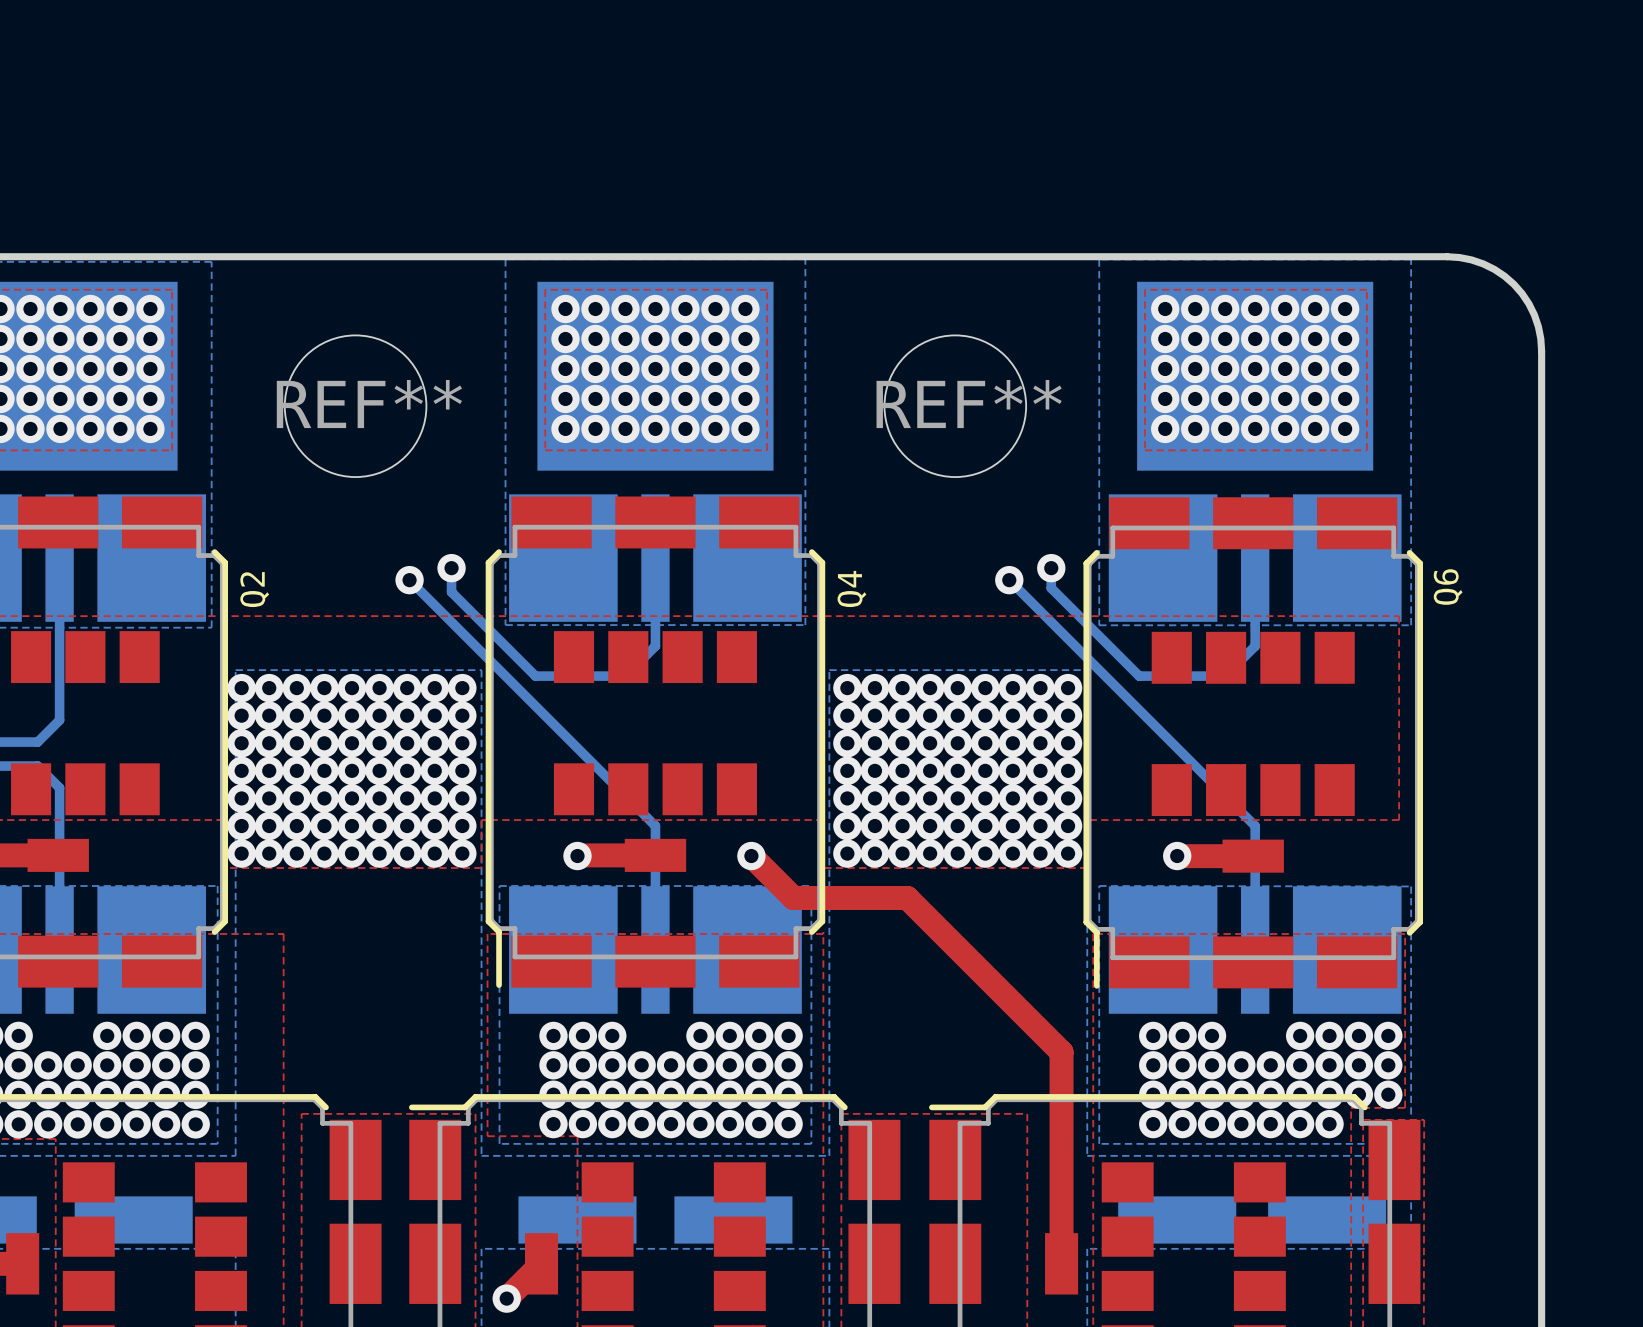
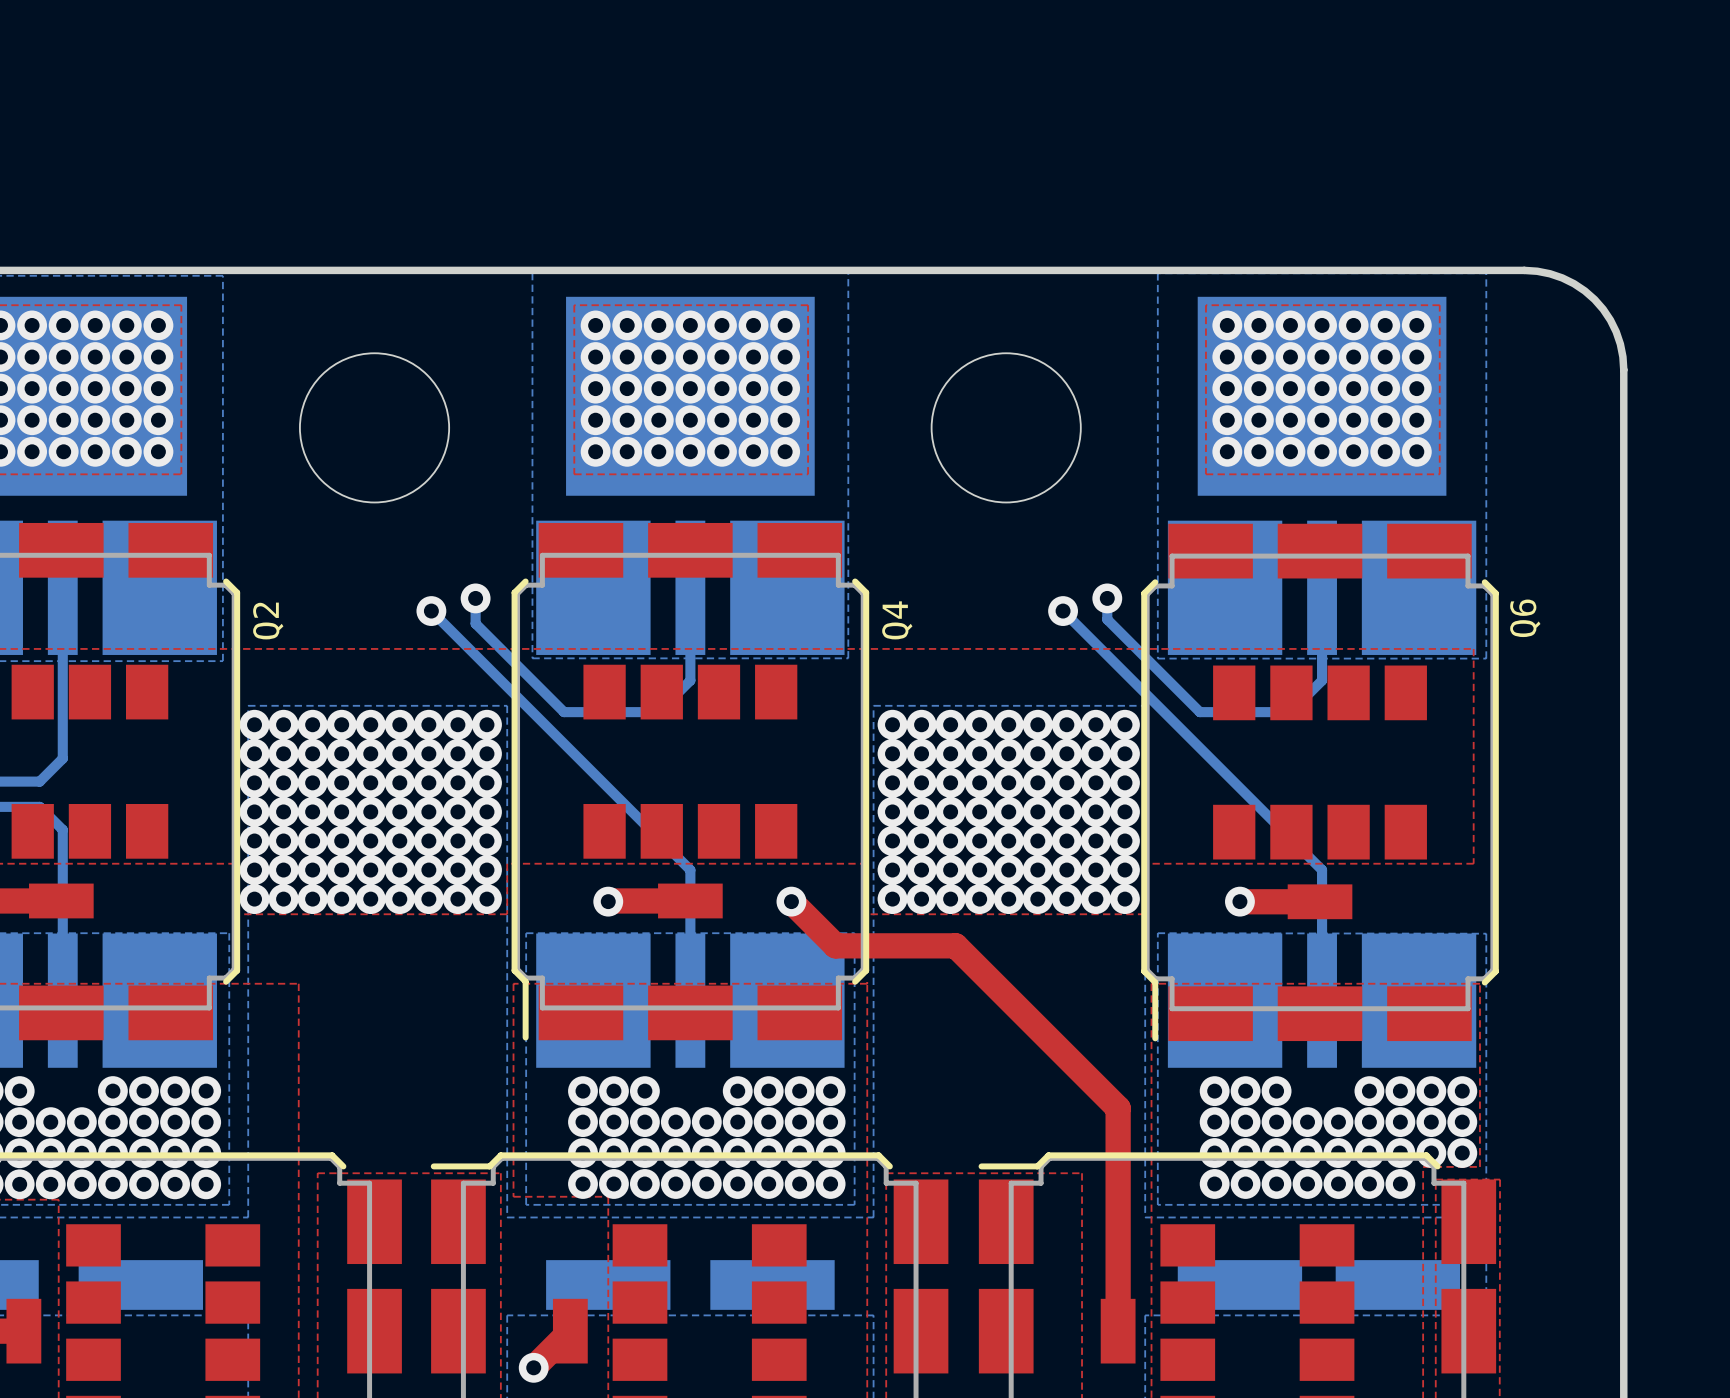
REF** name: REF** (369, 404) -> none
REF** name: REF** (969, 404) -> none

